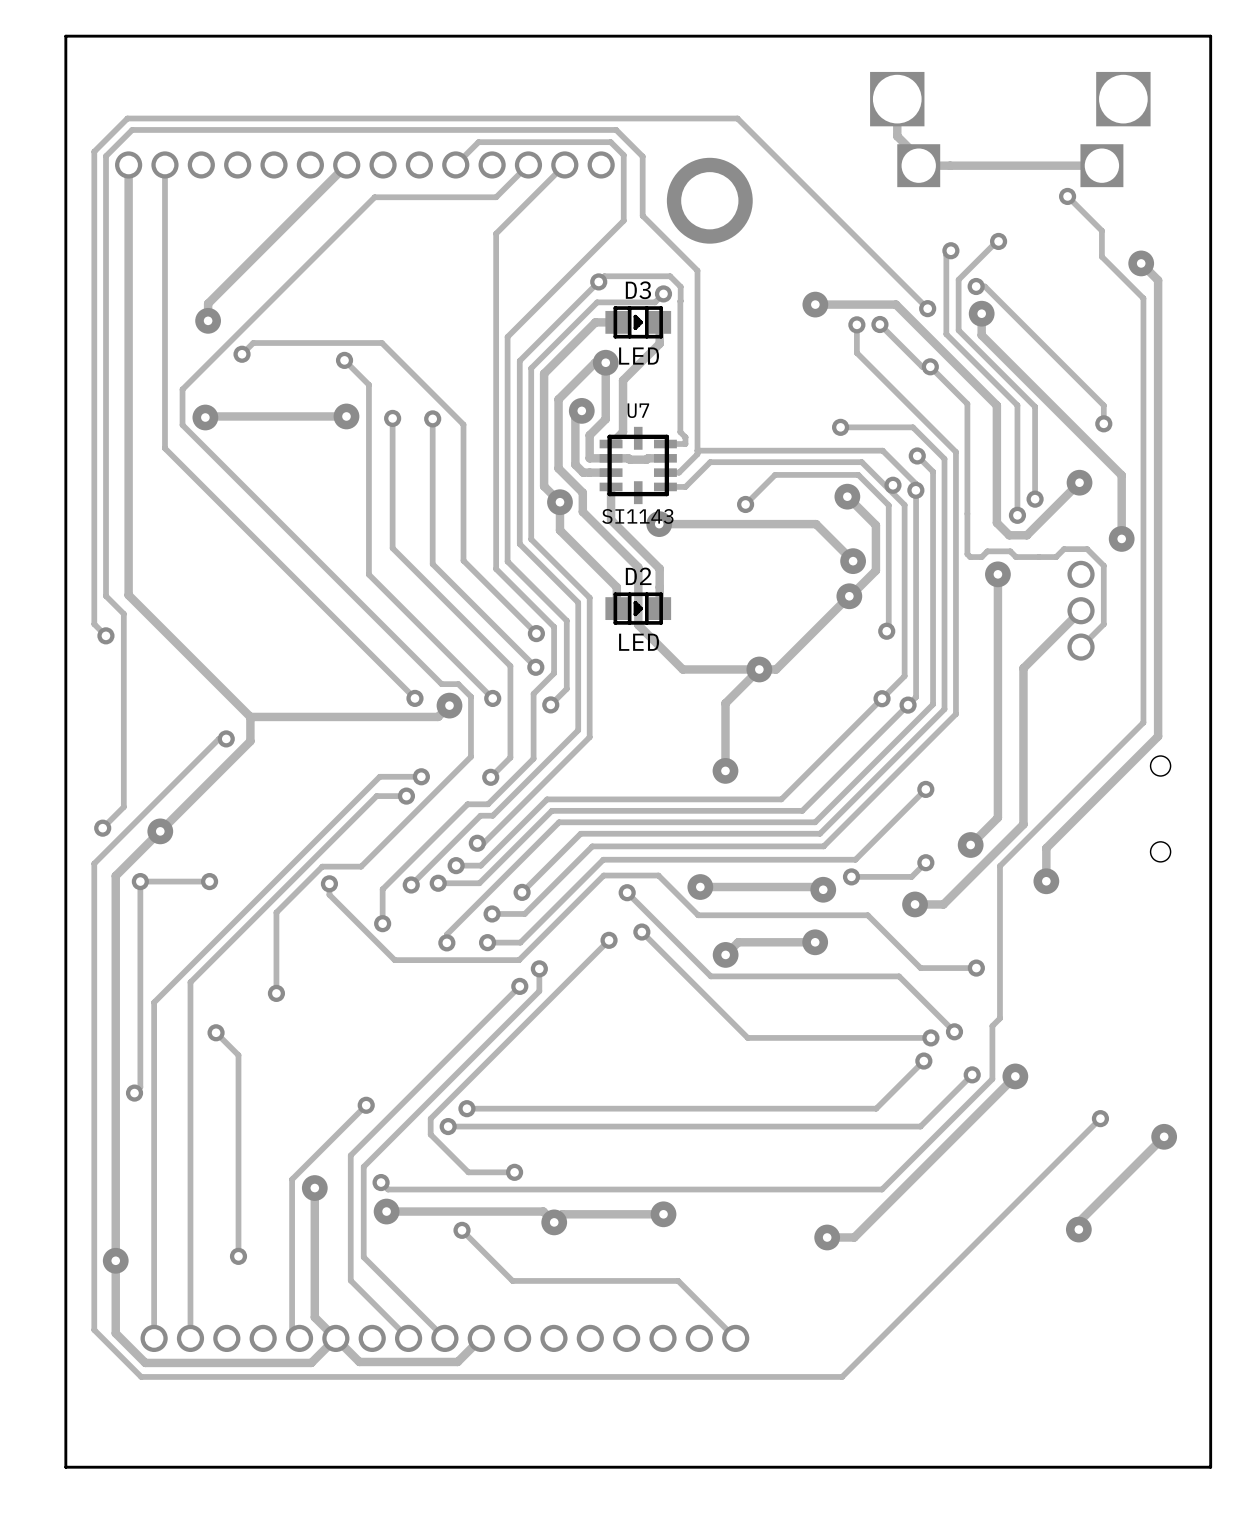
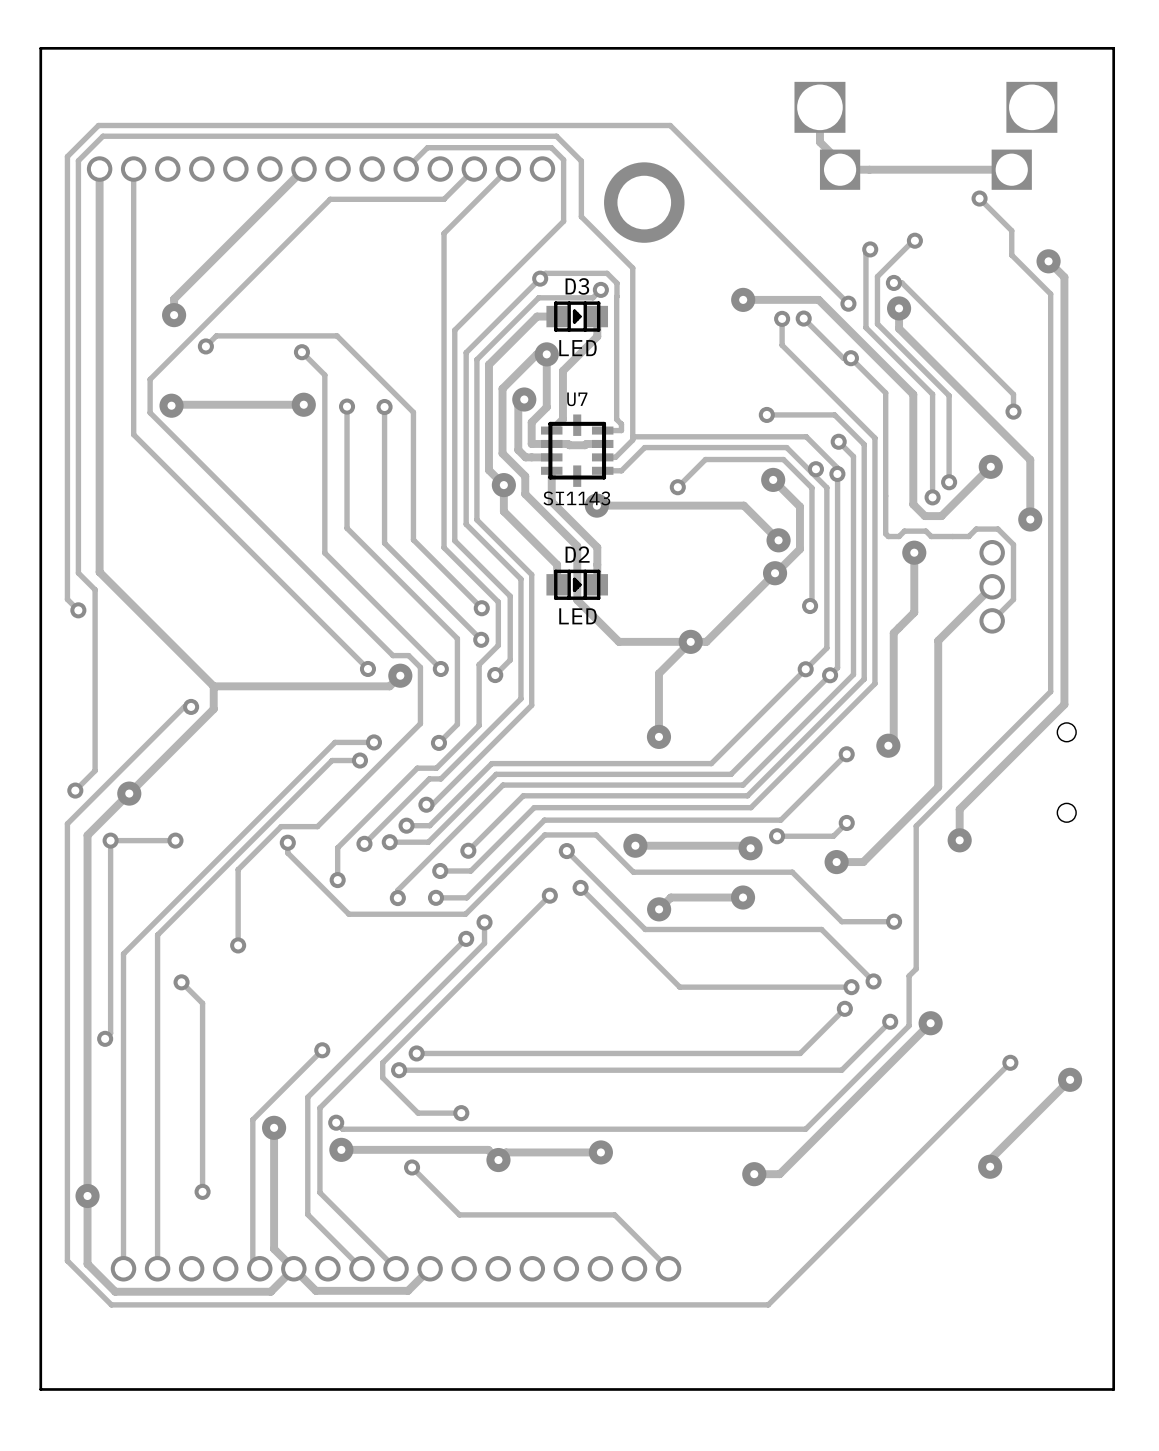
track: (997, 638) (997, 817) (970, 845) -> (914, 612) (893, 633) (893, 740) (888, 745)
via position: (970, 845) -> (888, 745)

